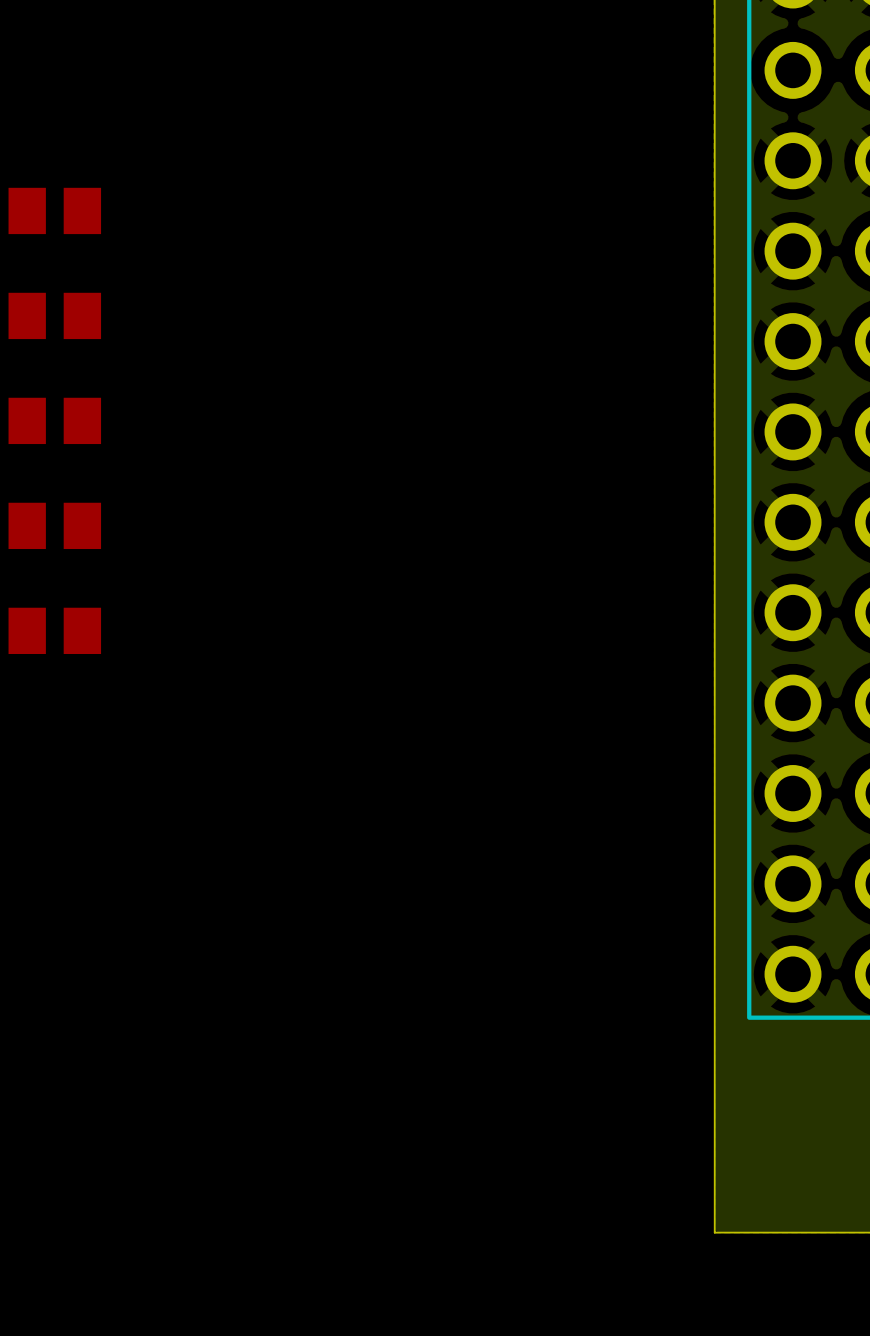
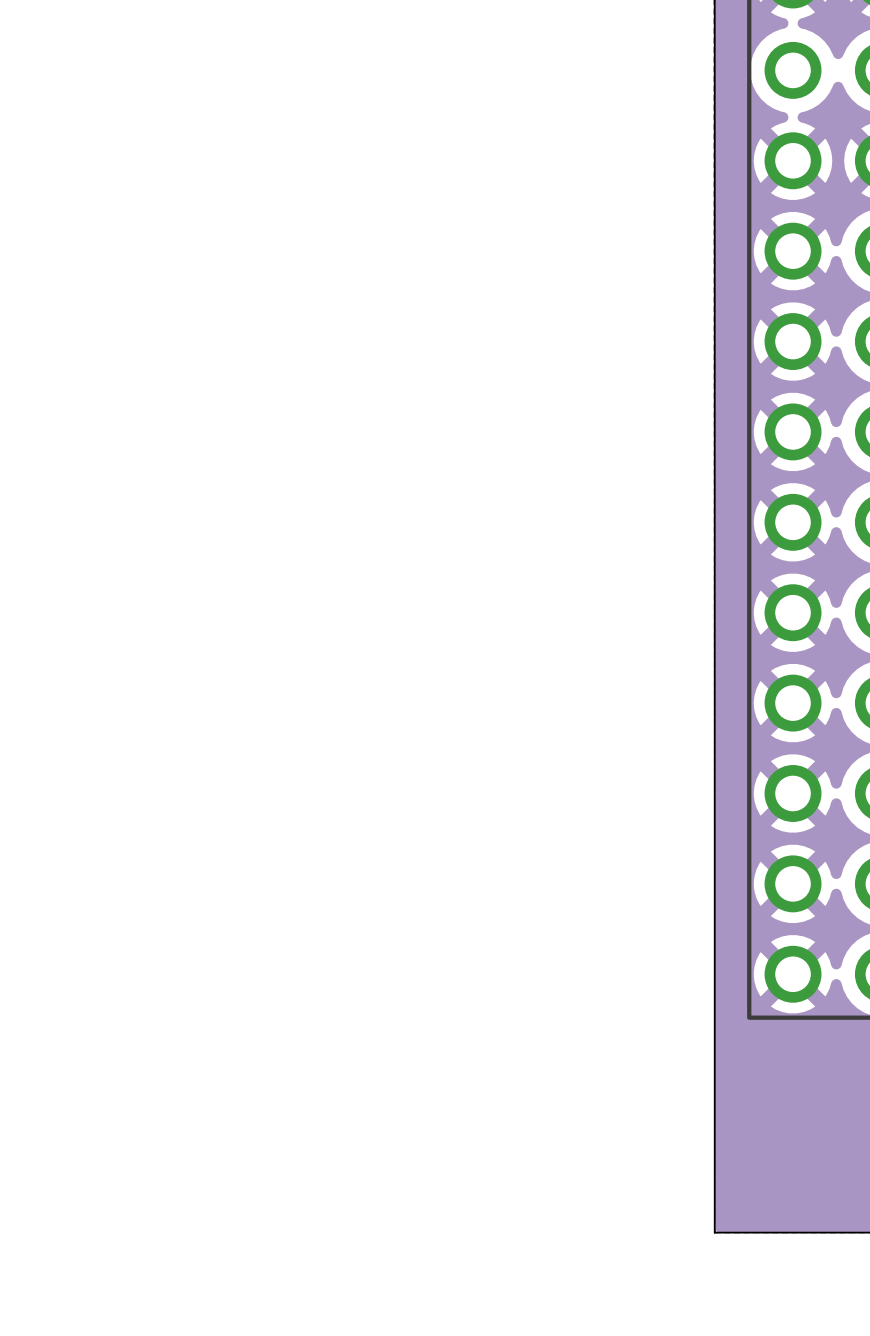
part: (54, 210) -> none
part: (54, 315) -> none
part: (54, 420) -> none
part: (54, 525) -> none
part: (54, 630) -> none

